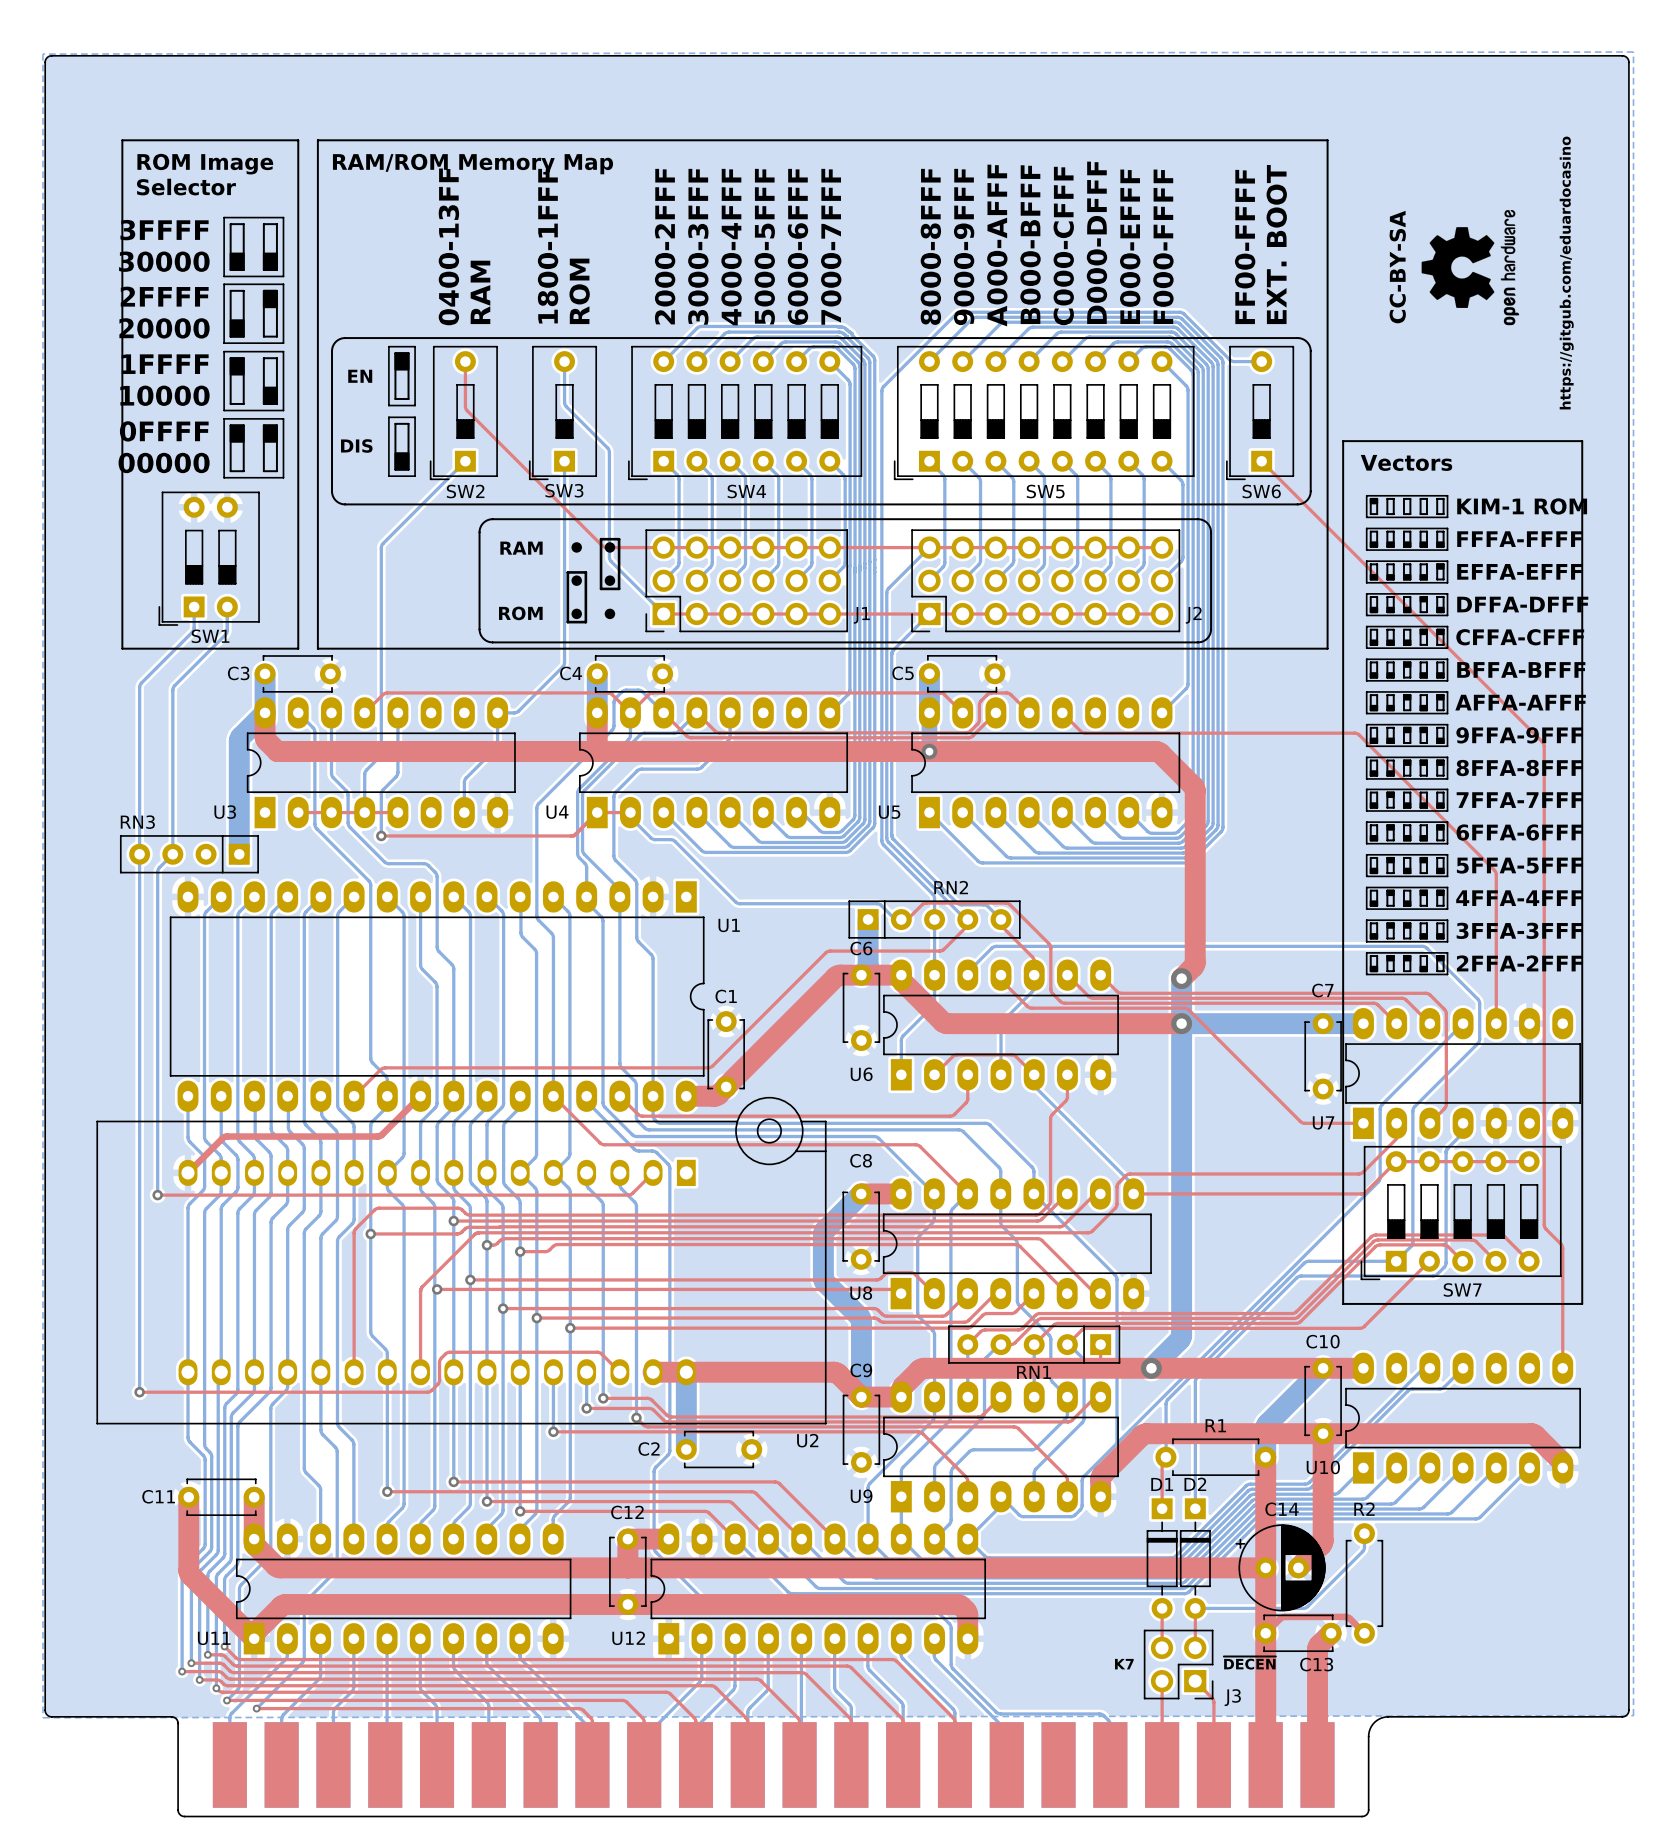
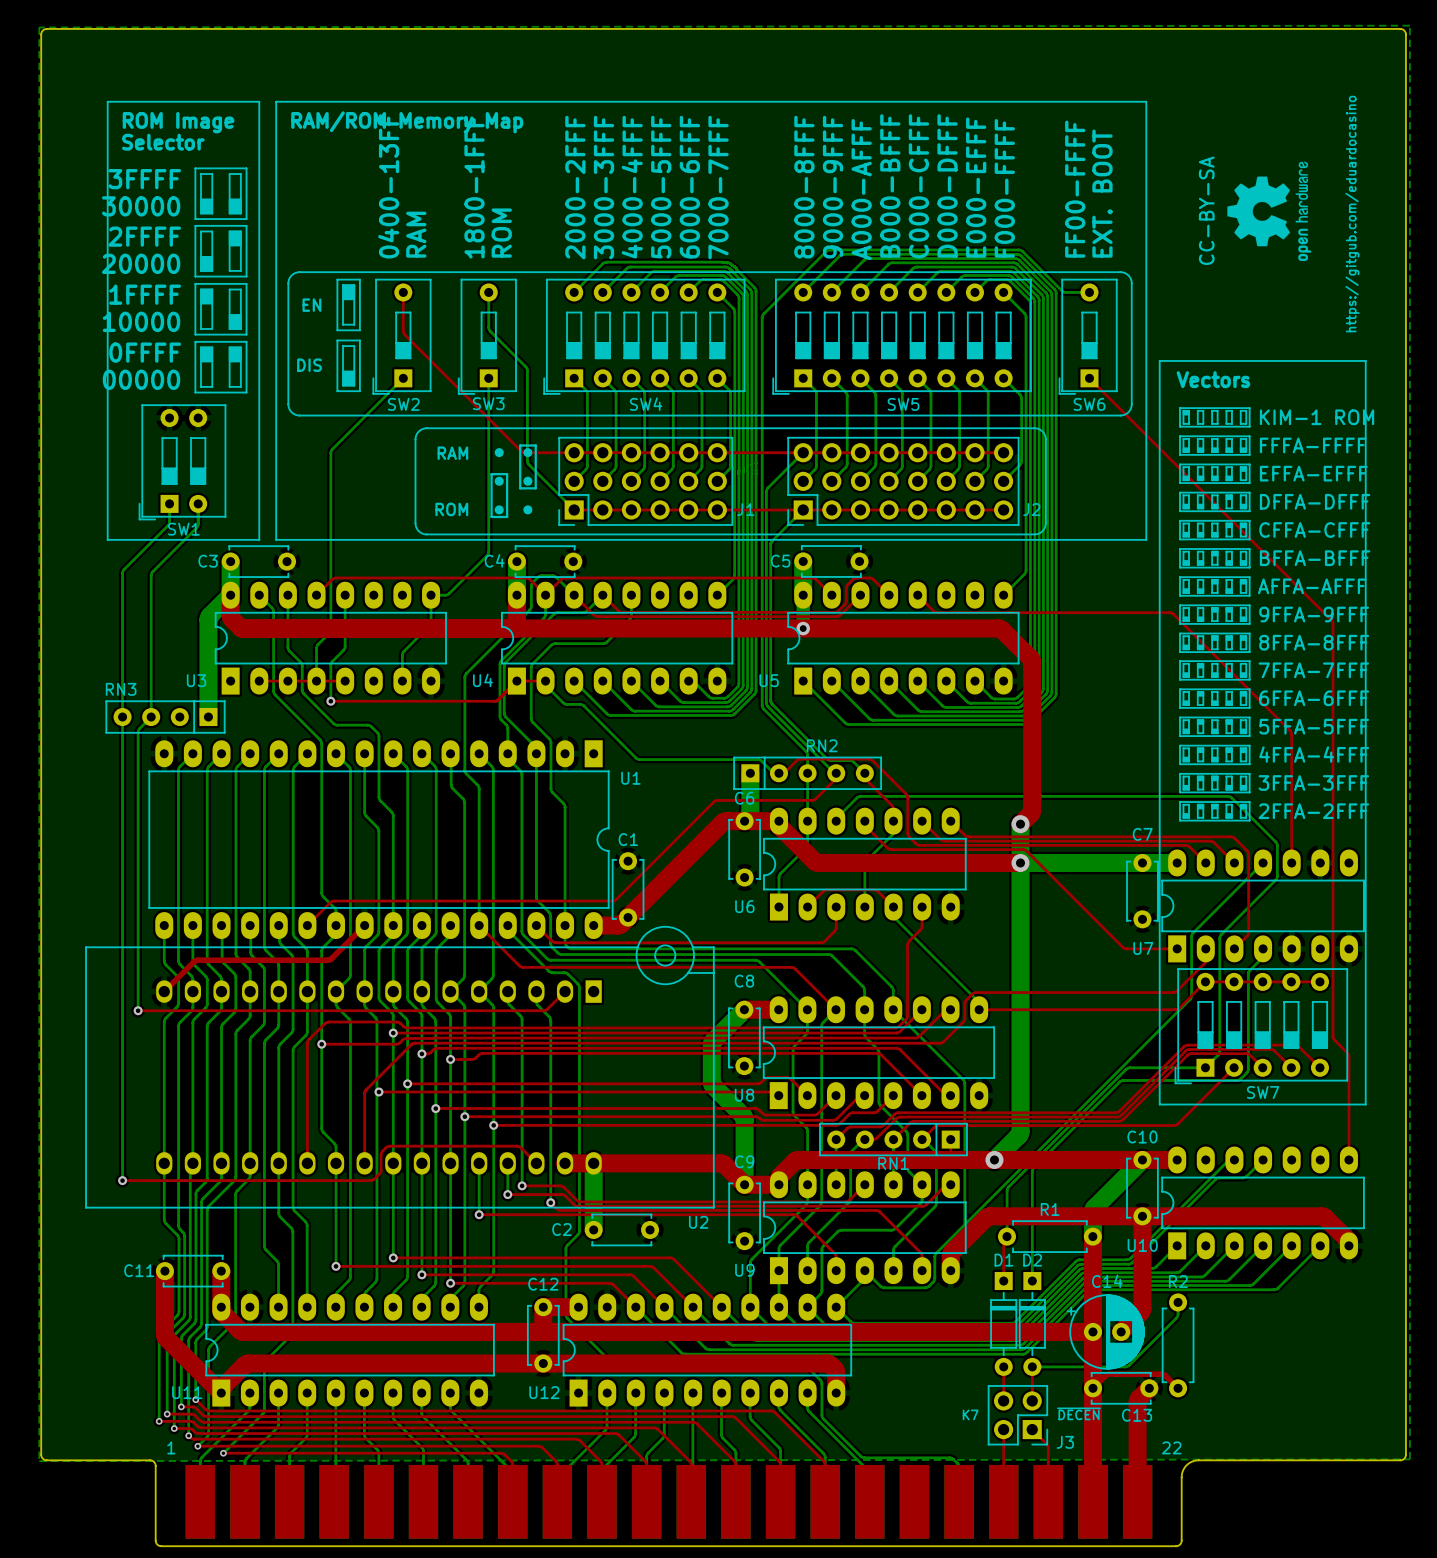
text: none -> 1 (171, 1447)
text: none -> 22 (1171, 1447)

